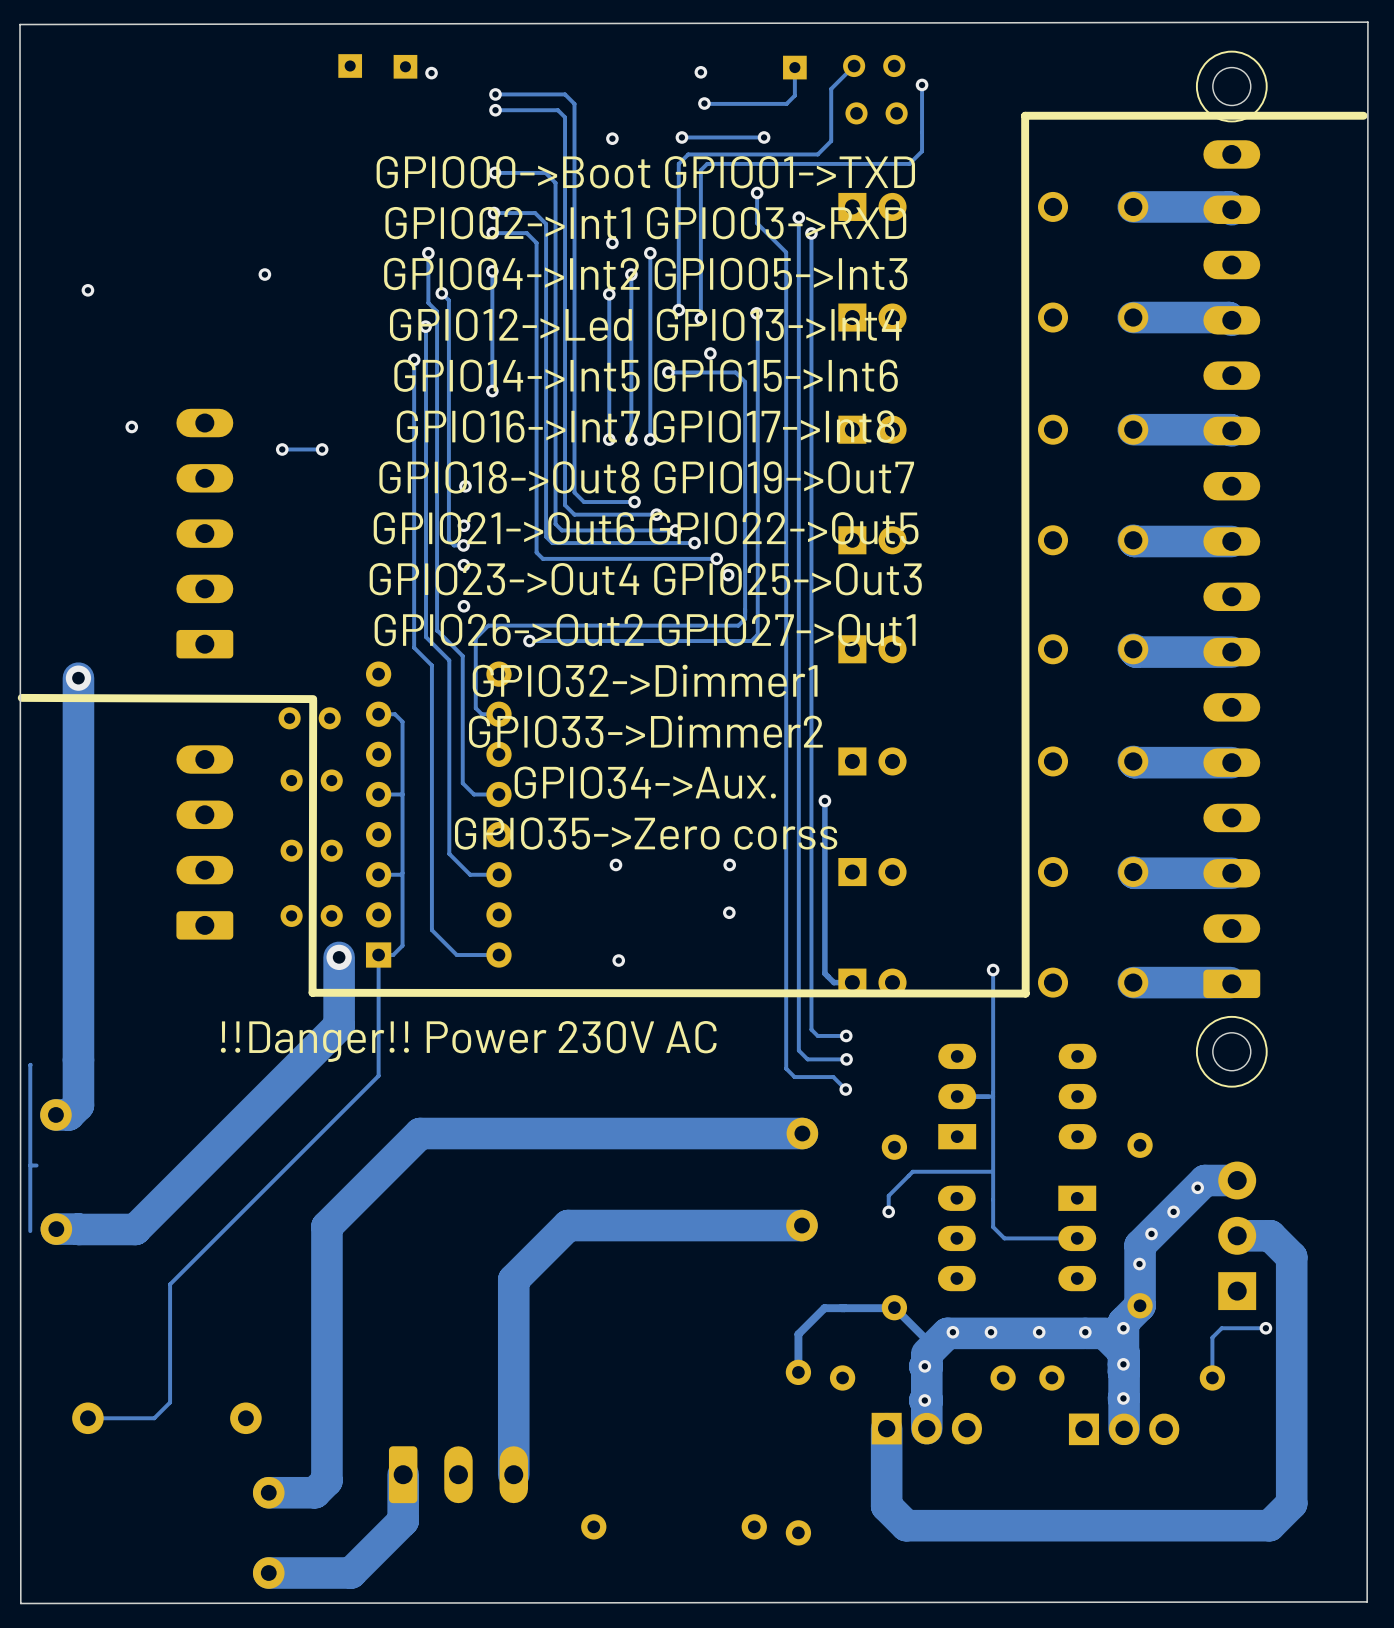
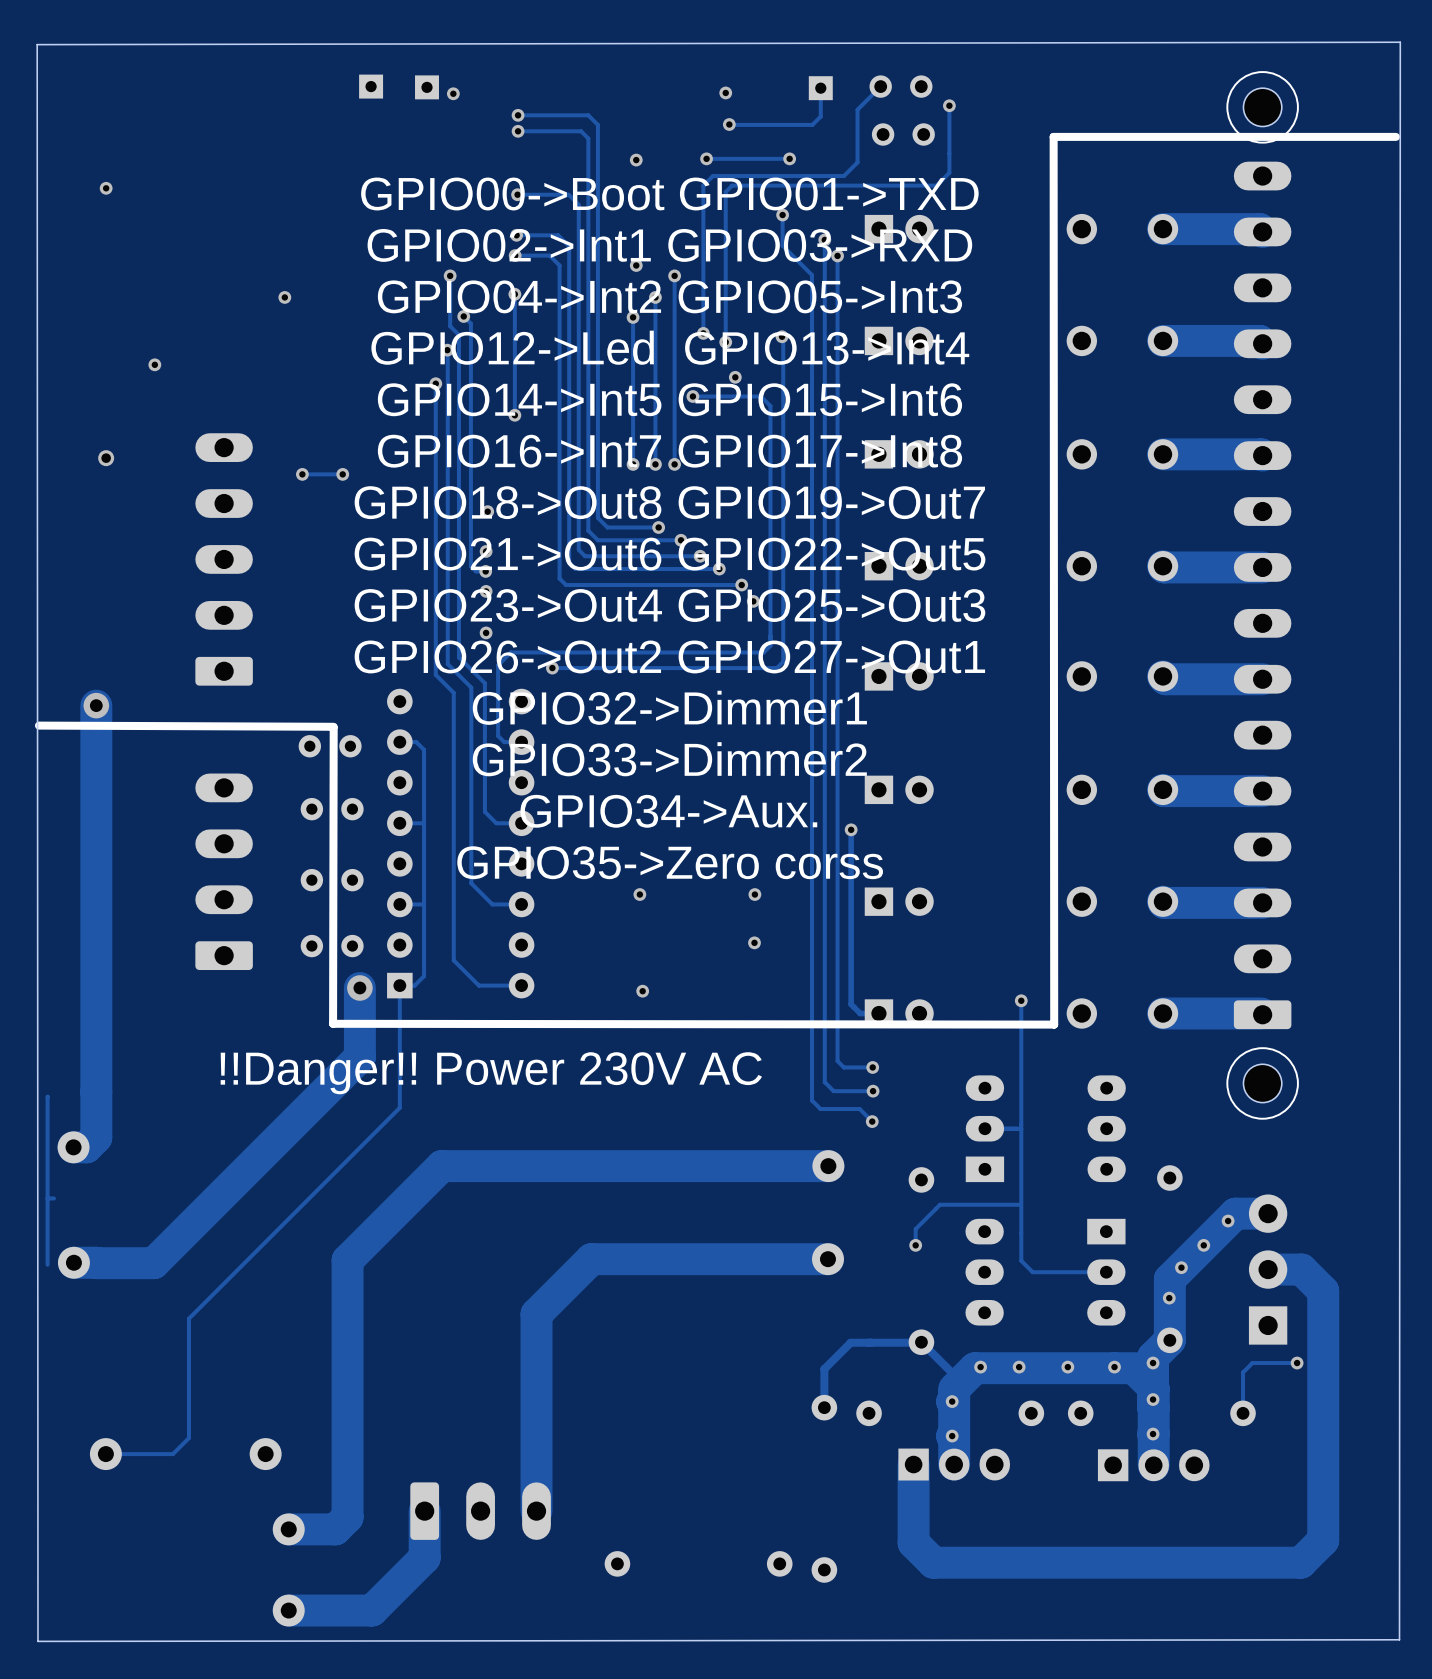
via: none -> (106, 188)
via: (87, 290) -> none
via: none -> (154, 364)
via: (131, 426) -> none
via: none -> (106, 458)

